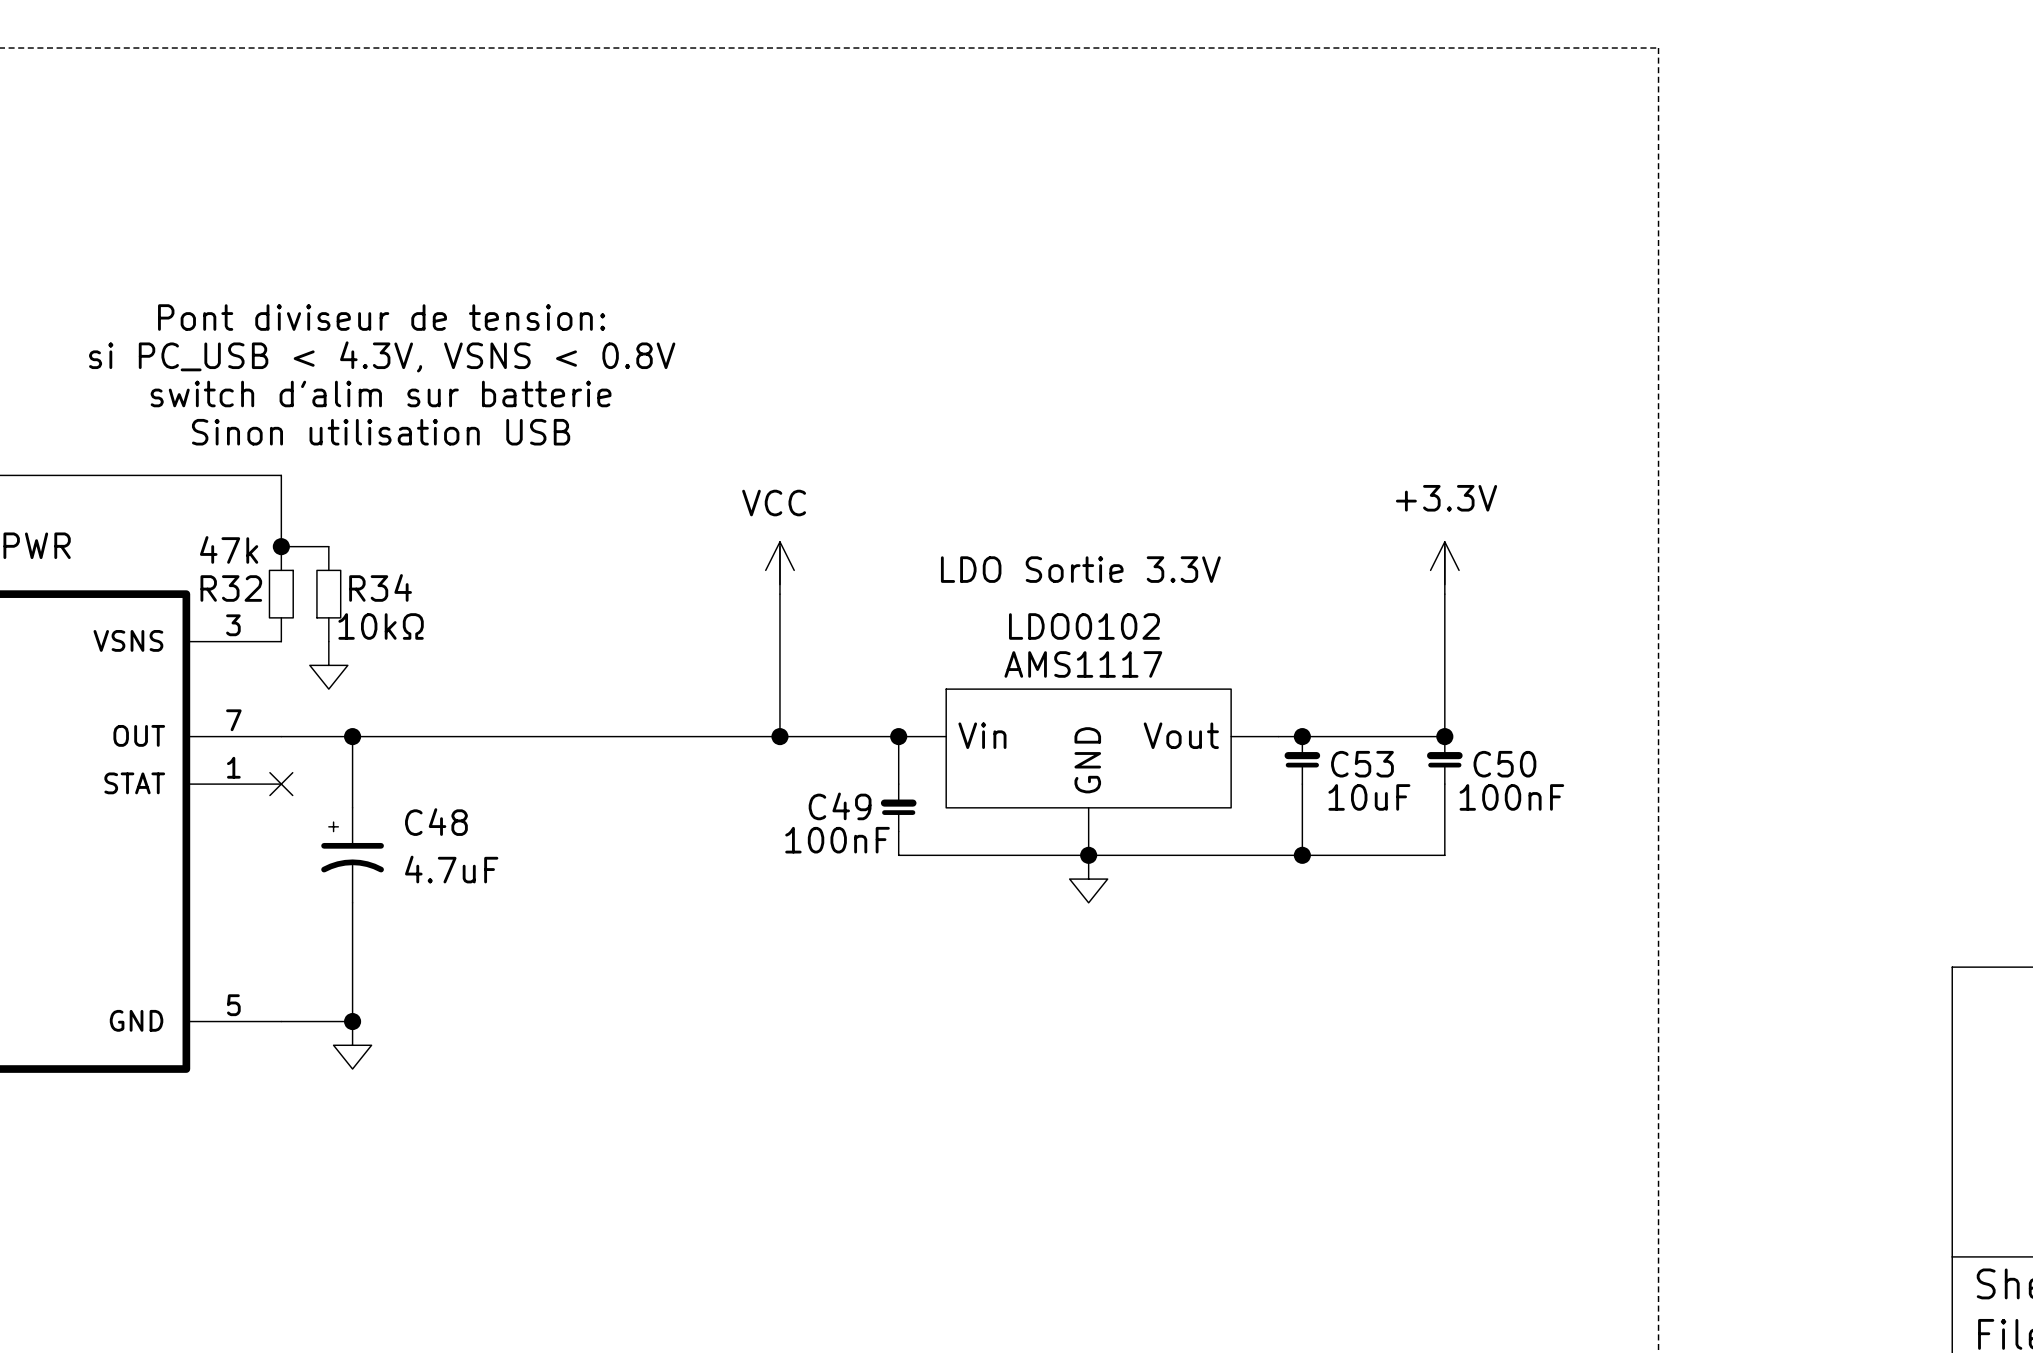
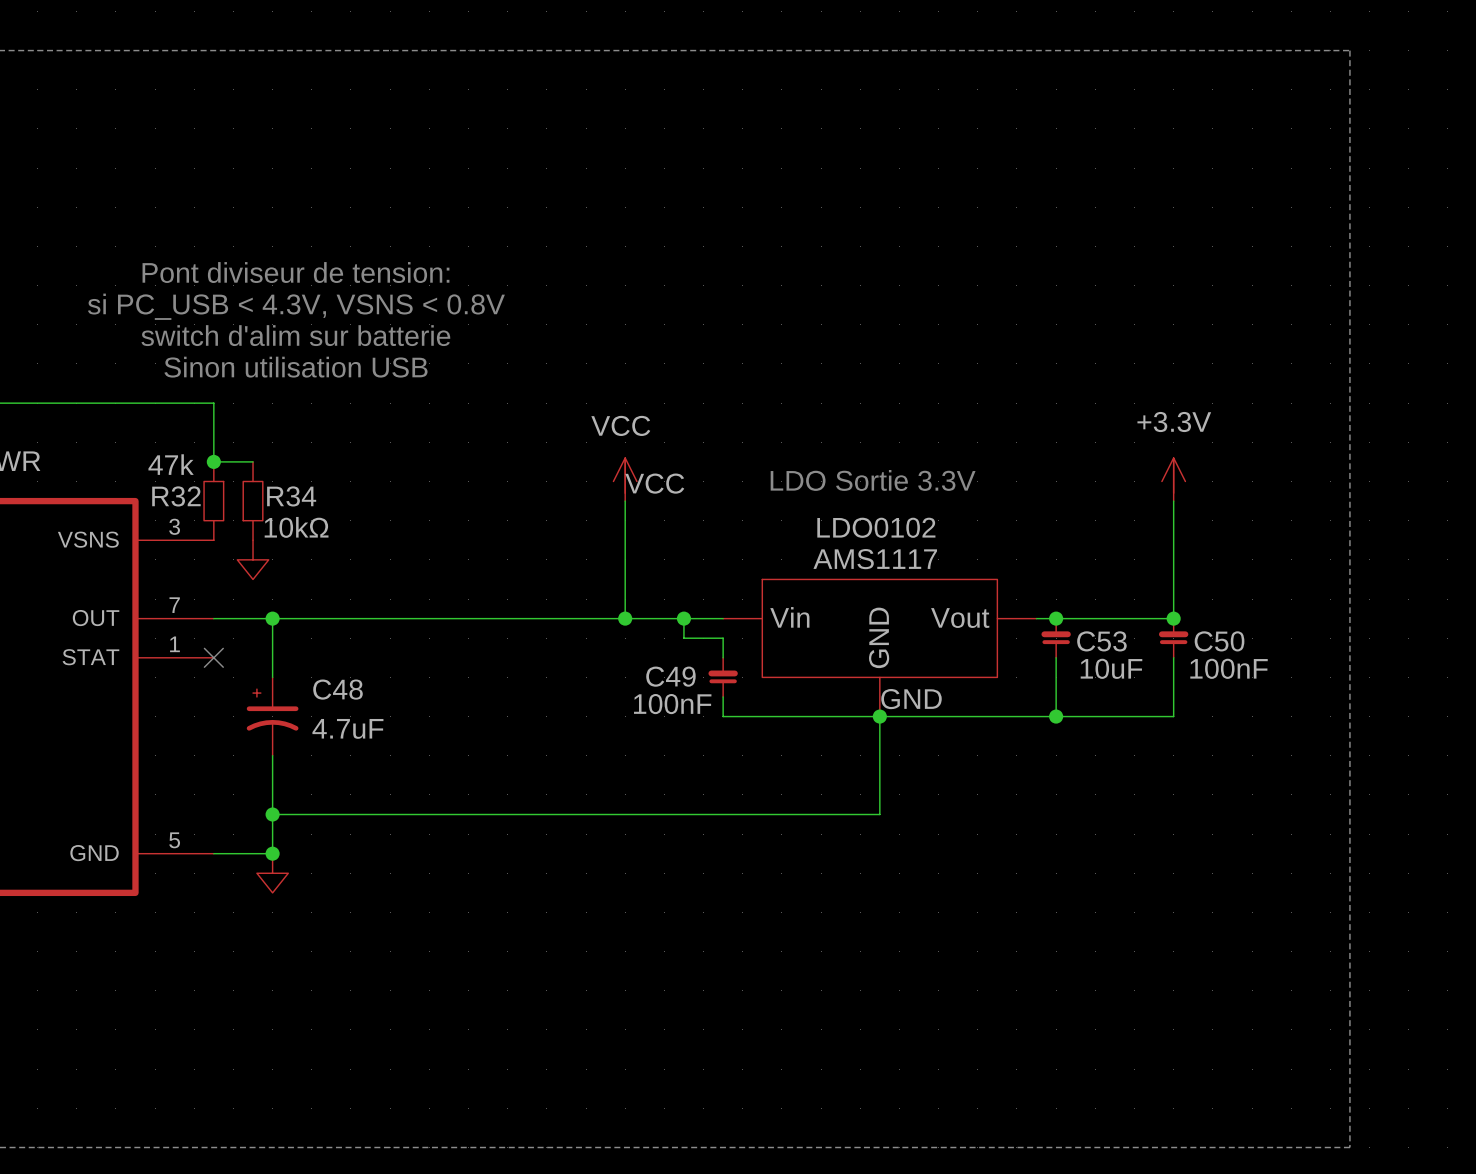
label: none -> VCC (654, 483)
wire: (898, 736) (898, 760) -> (683, 618) (683, 638) (723, 638)
junction position: (898, 736) -> (683, 618)
label: none -> GND (911, 699)
wire: none -> (879, 716) (879, 814) (272, 814)
power symbol: (1088, 879) -> none
junction: none -> (272, 814)

